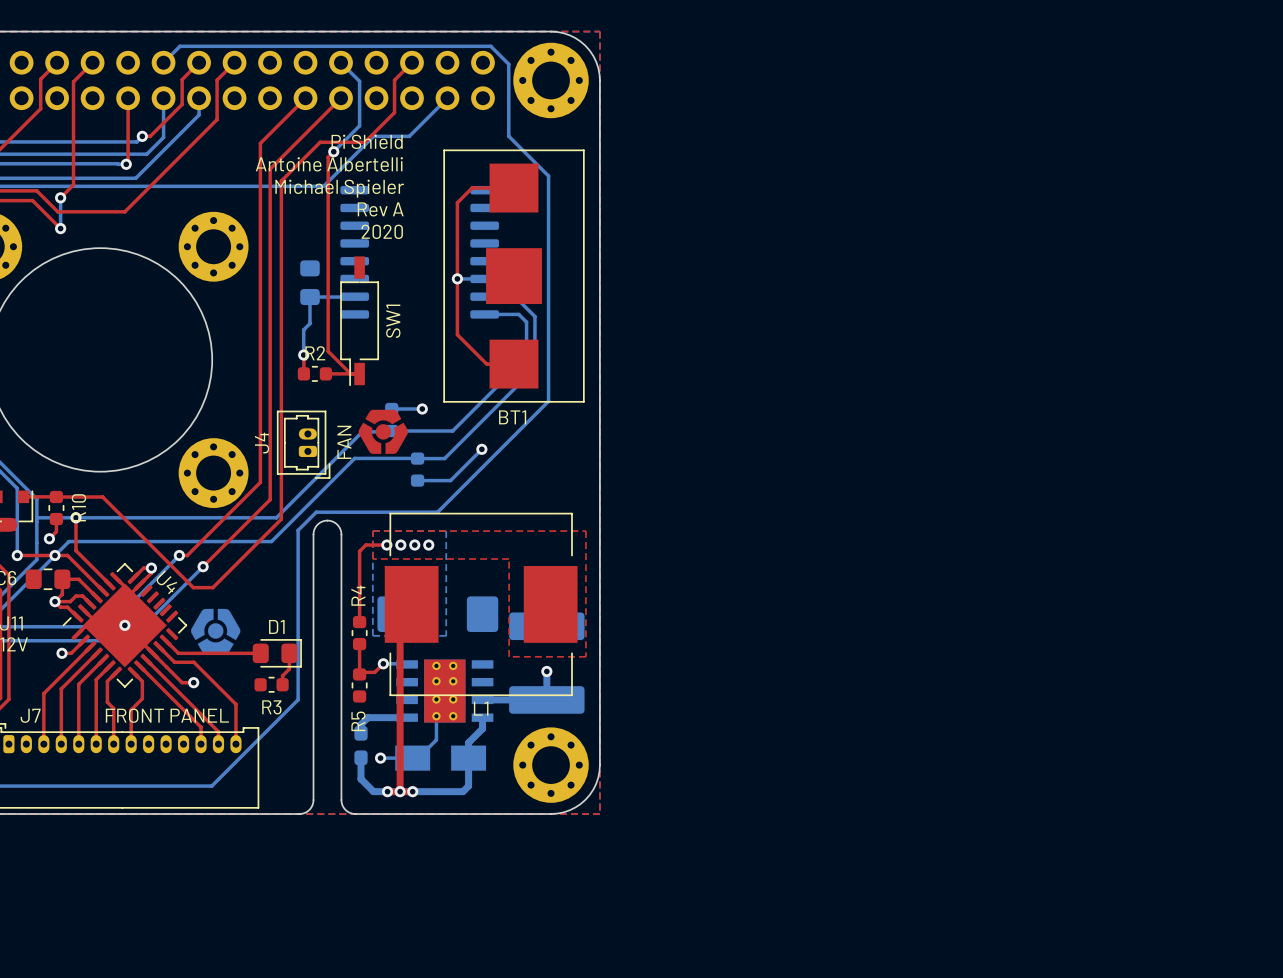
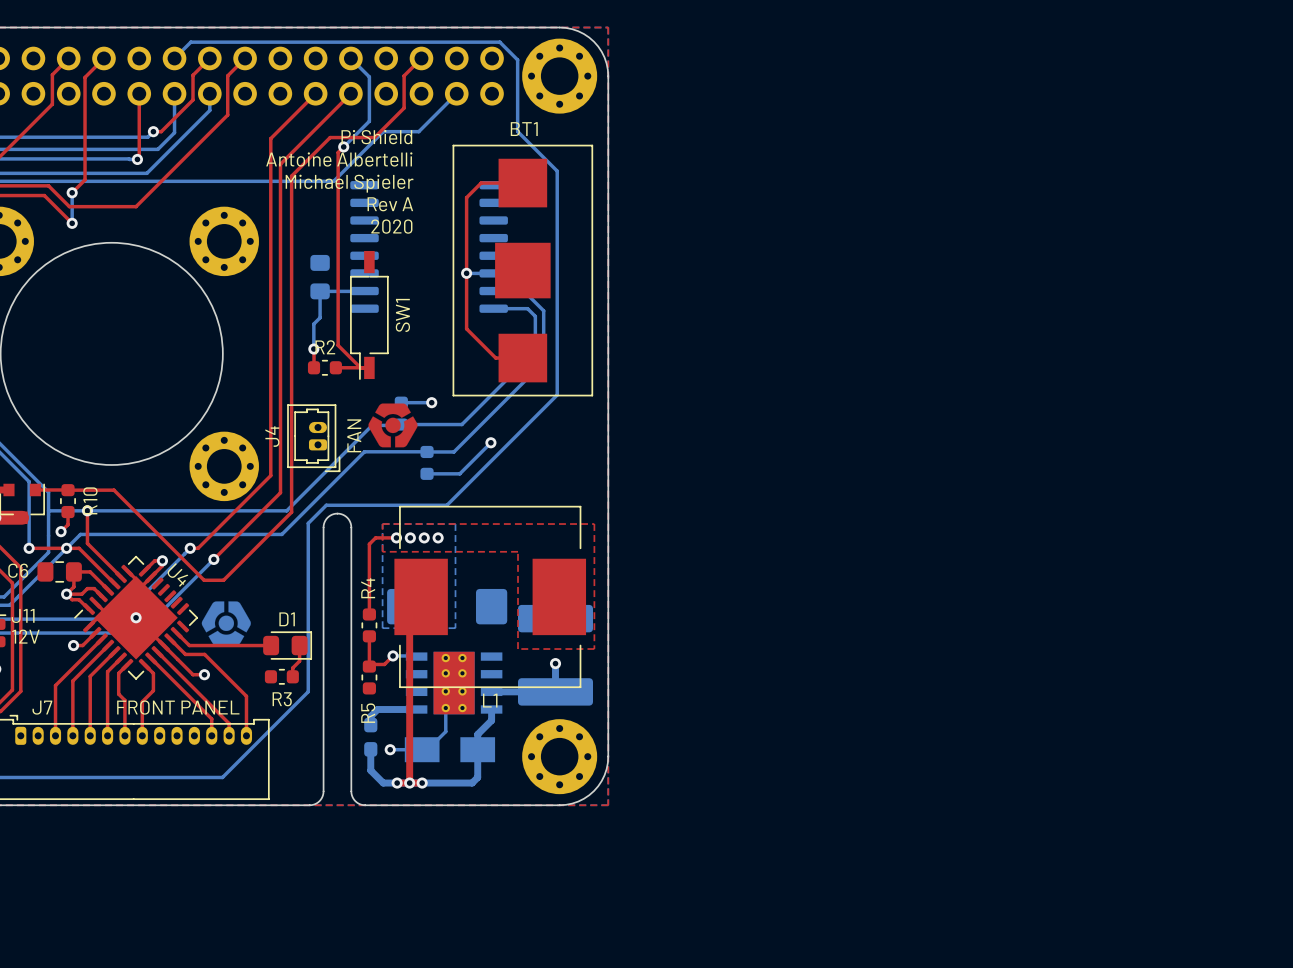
BT1 name position: BT1 (512, 417) -> BT1 (524, 129)

